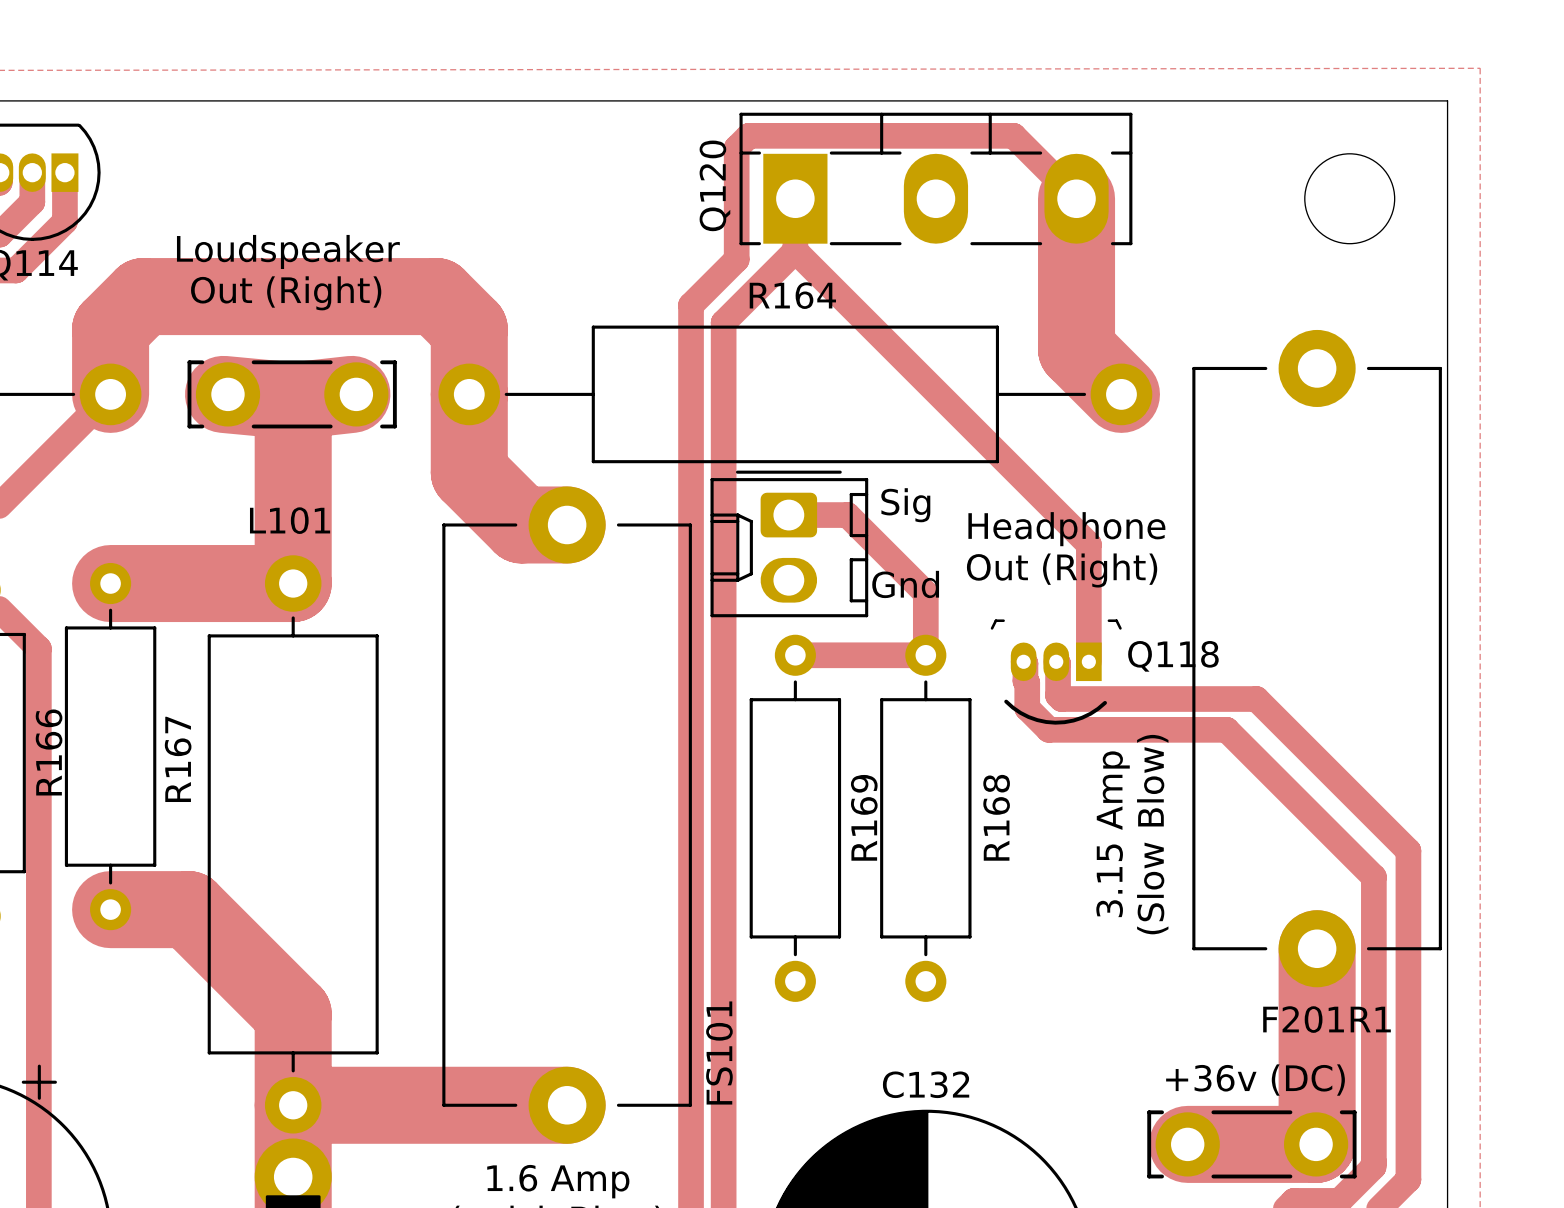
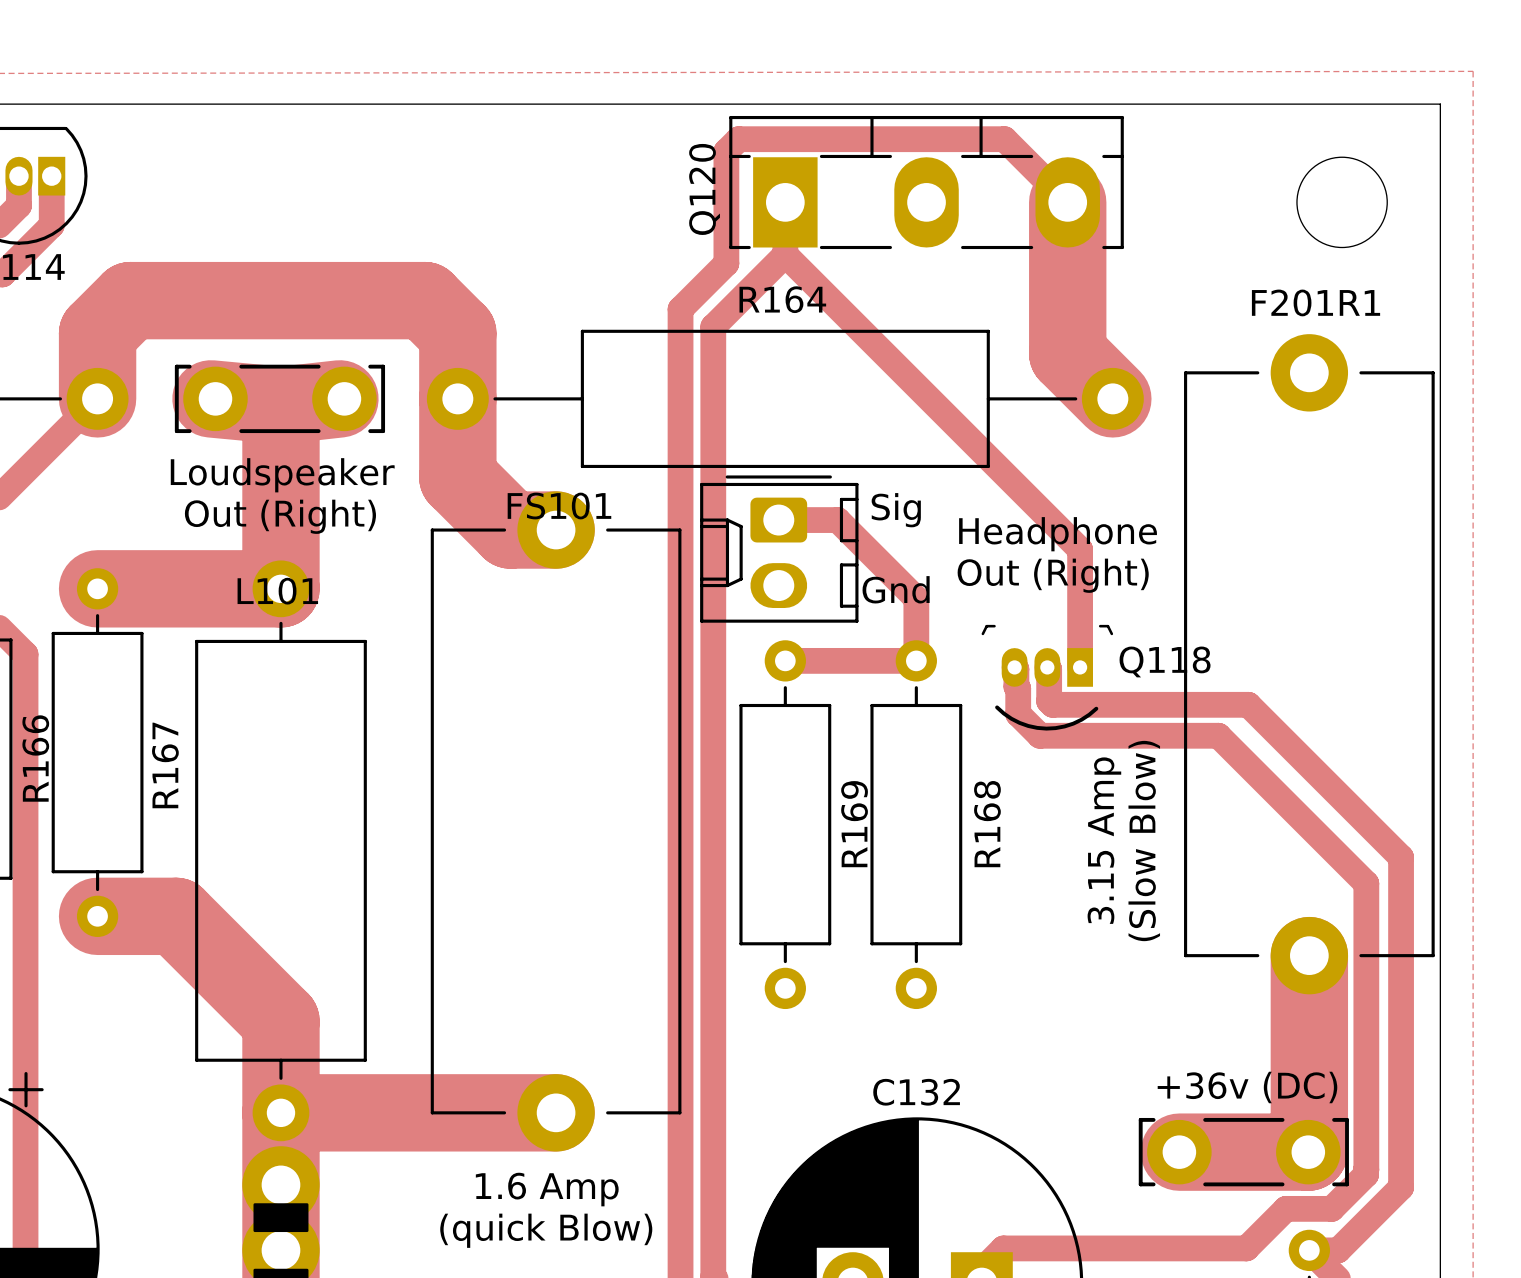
text position: Loudspeaker (288, 251) -> Loudspeaker (282, 475)
text position: Out (Right) (286, 293) -> Out (Right) (280, 516)
L101 name position: L101 (290, 520) -> L101 (277, 591)
F201R1 name position: F201R1 (1327, 1019) -> F201R1 (1316, 302)
FS101 name rotation: 0° (719, 1053) -> 90° clockwise (559, 506)
FS101 name position: FS101 (719, 1053) -> FS101 (559, 506)

